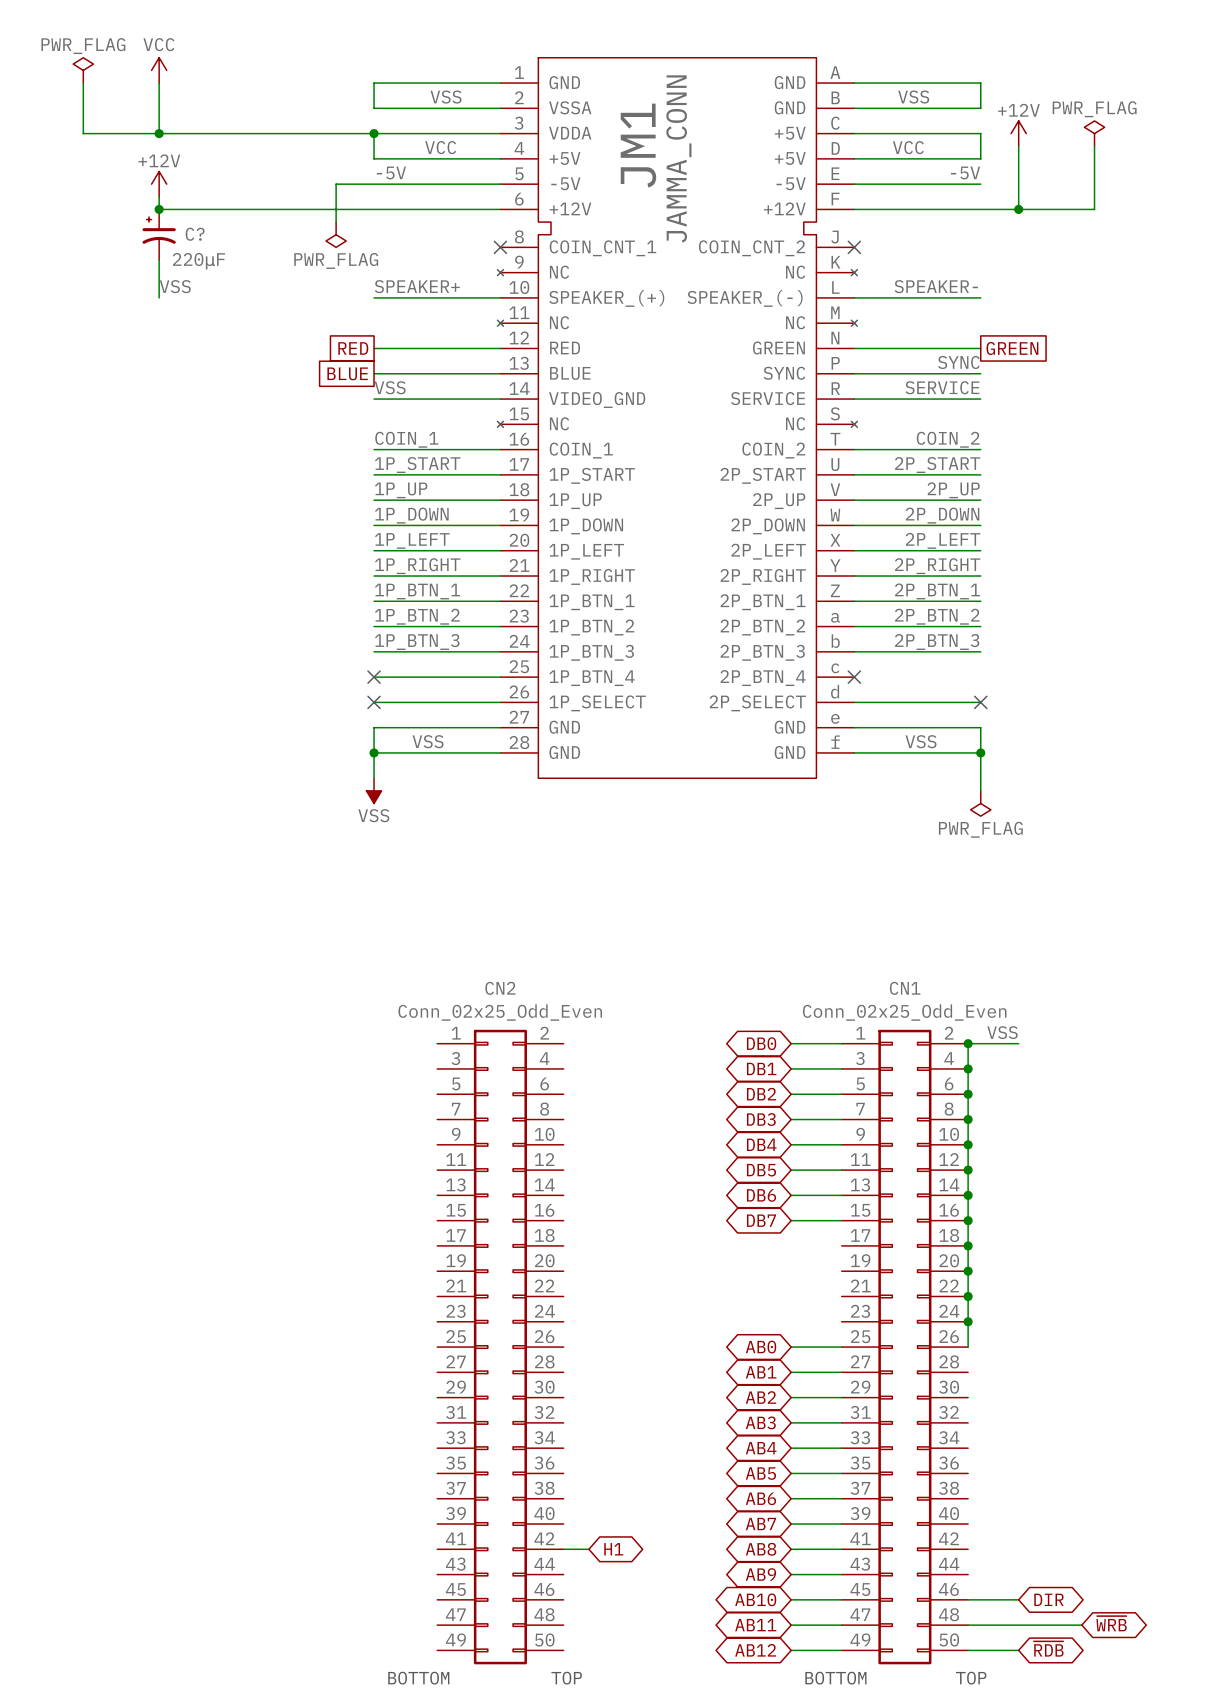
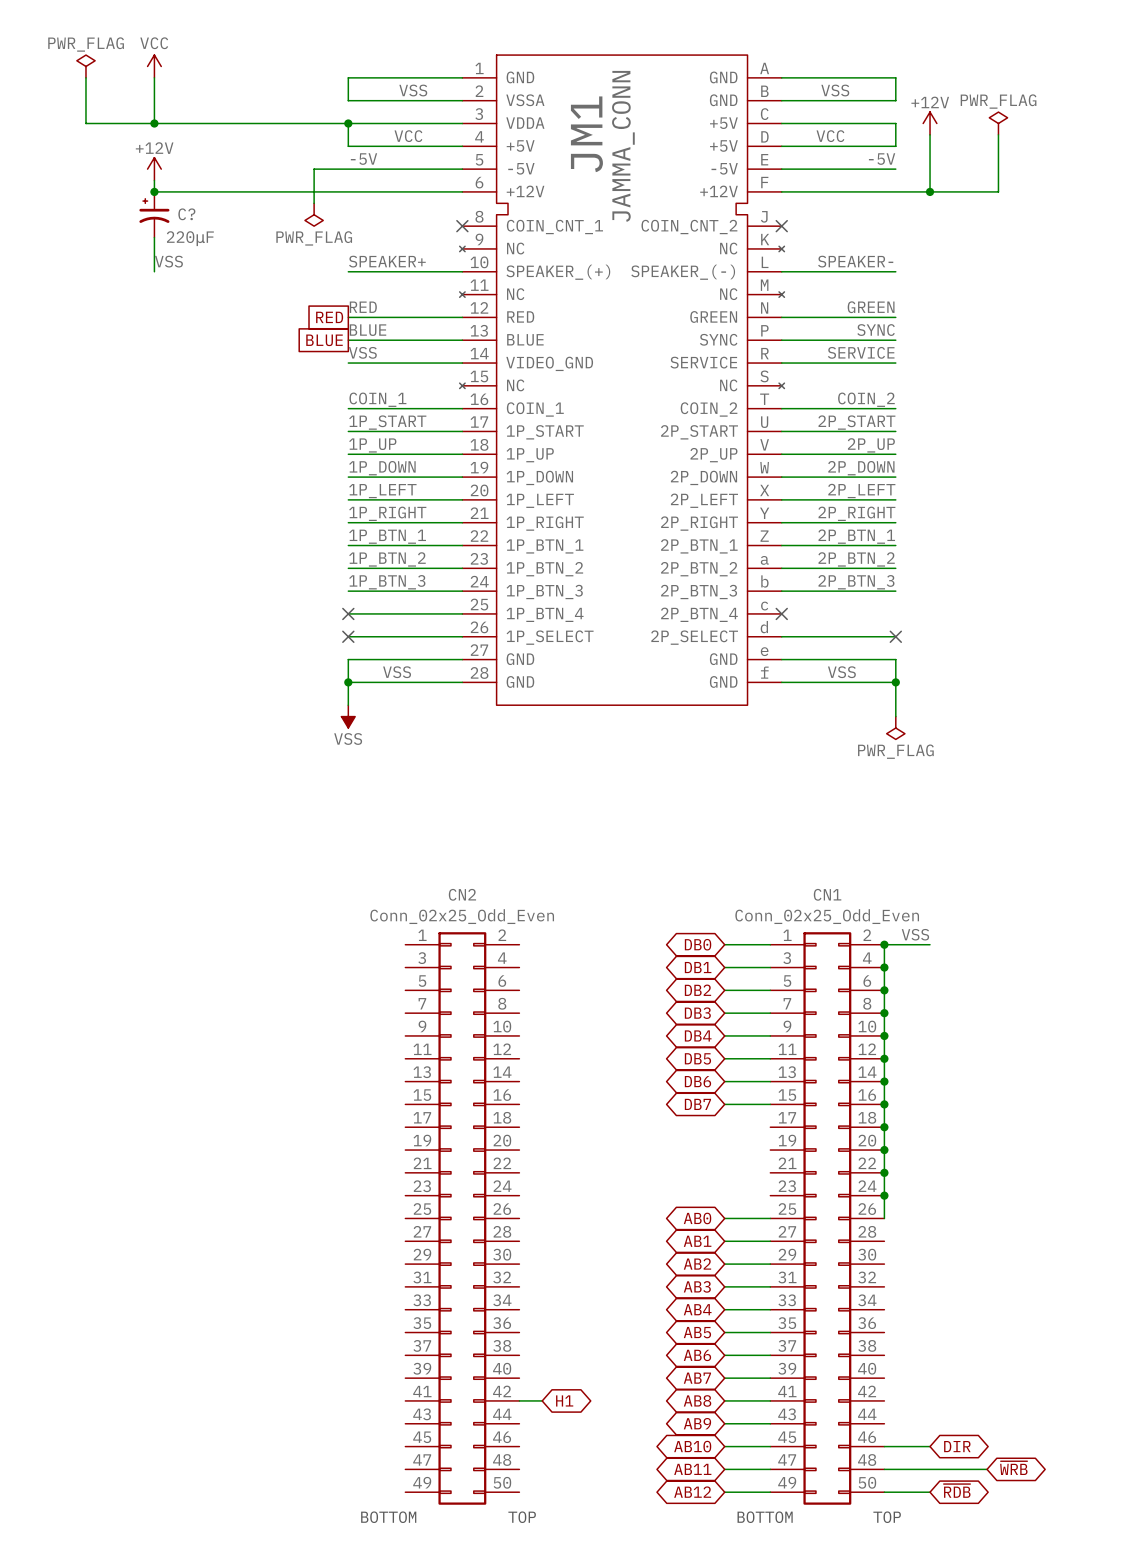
label: none -> RED (363, 307)
label: none -> GREEN (871, 307)
global label: GREEN (1012, 348) -> none
label: none -> BLUE (367, 330)

